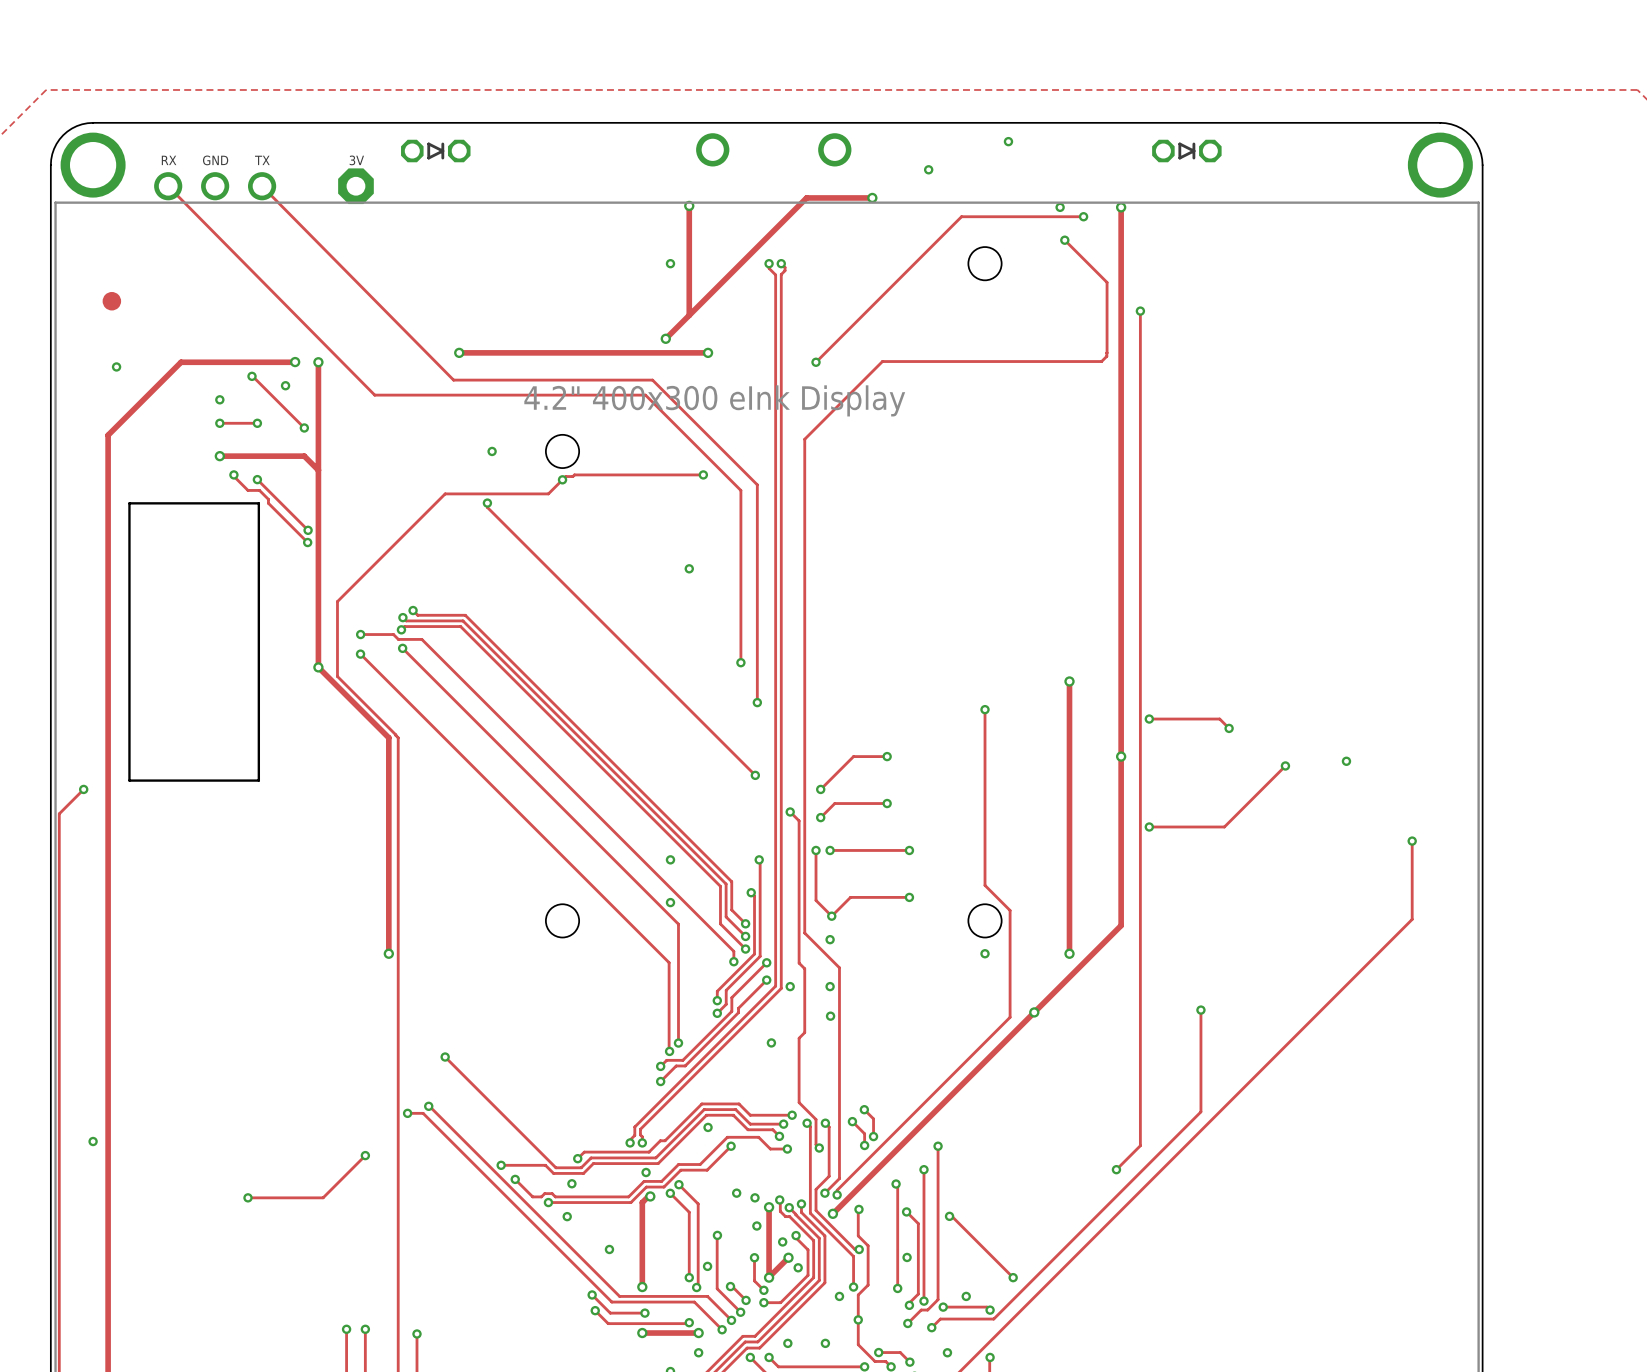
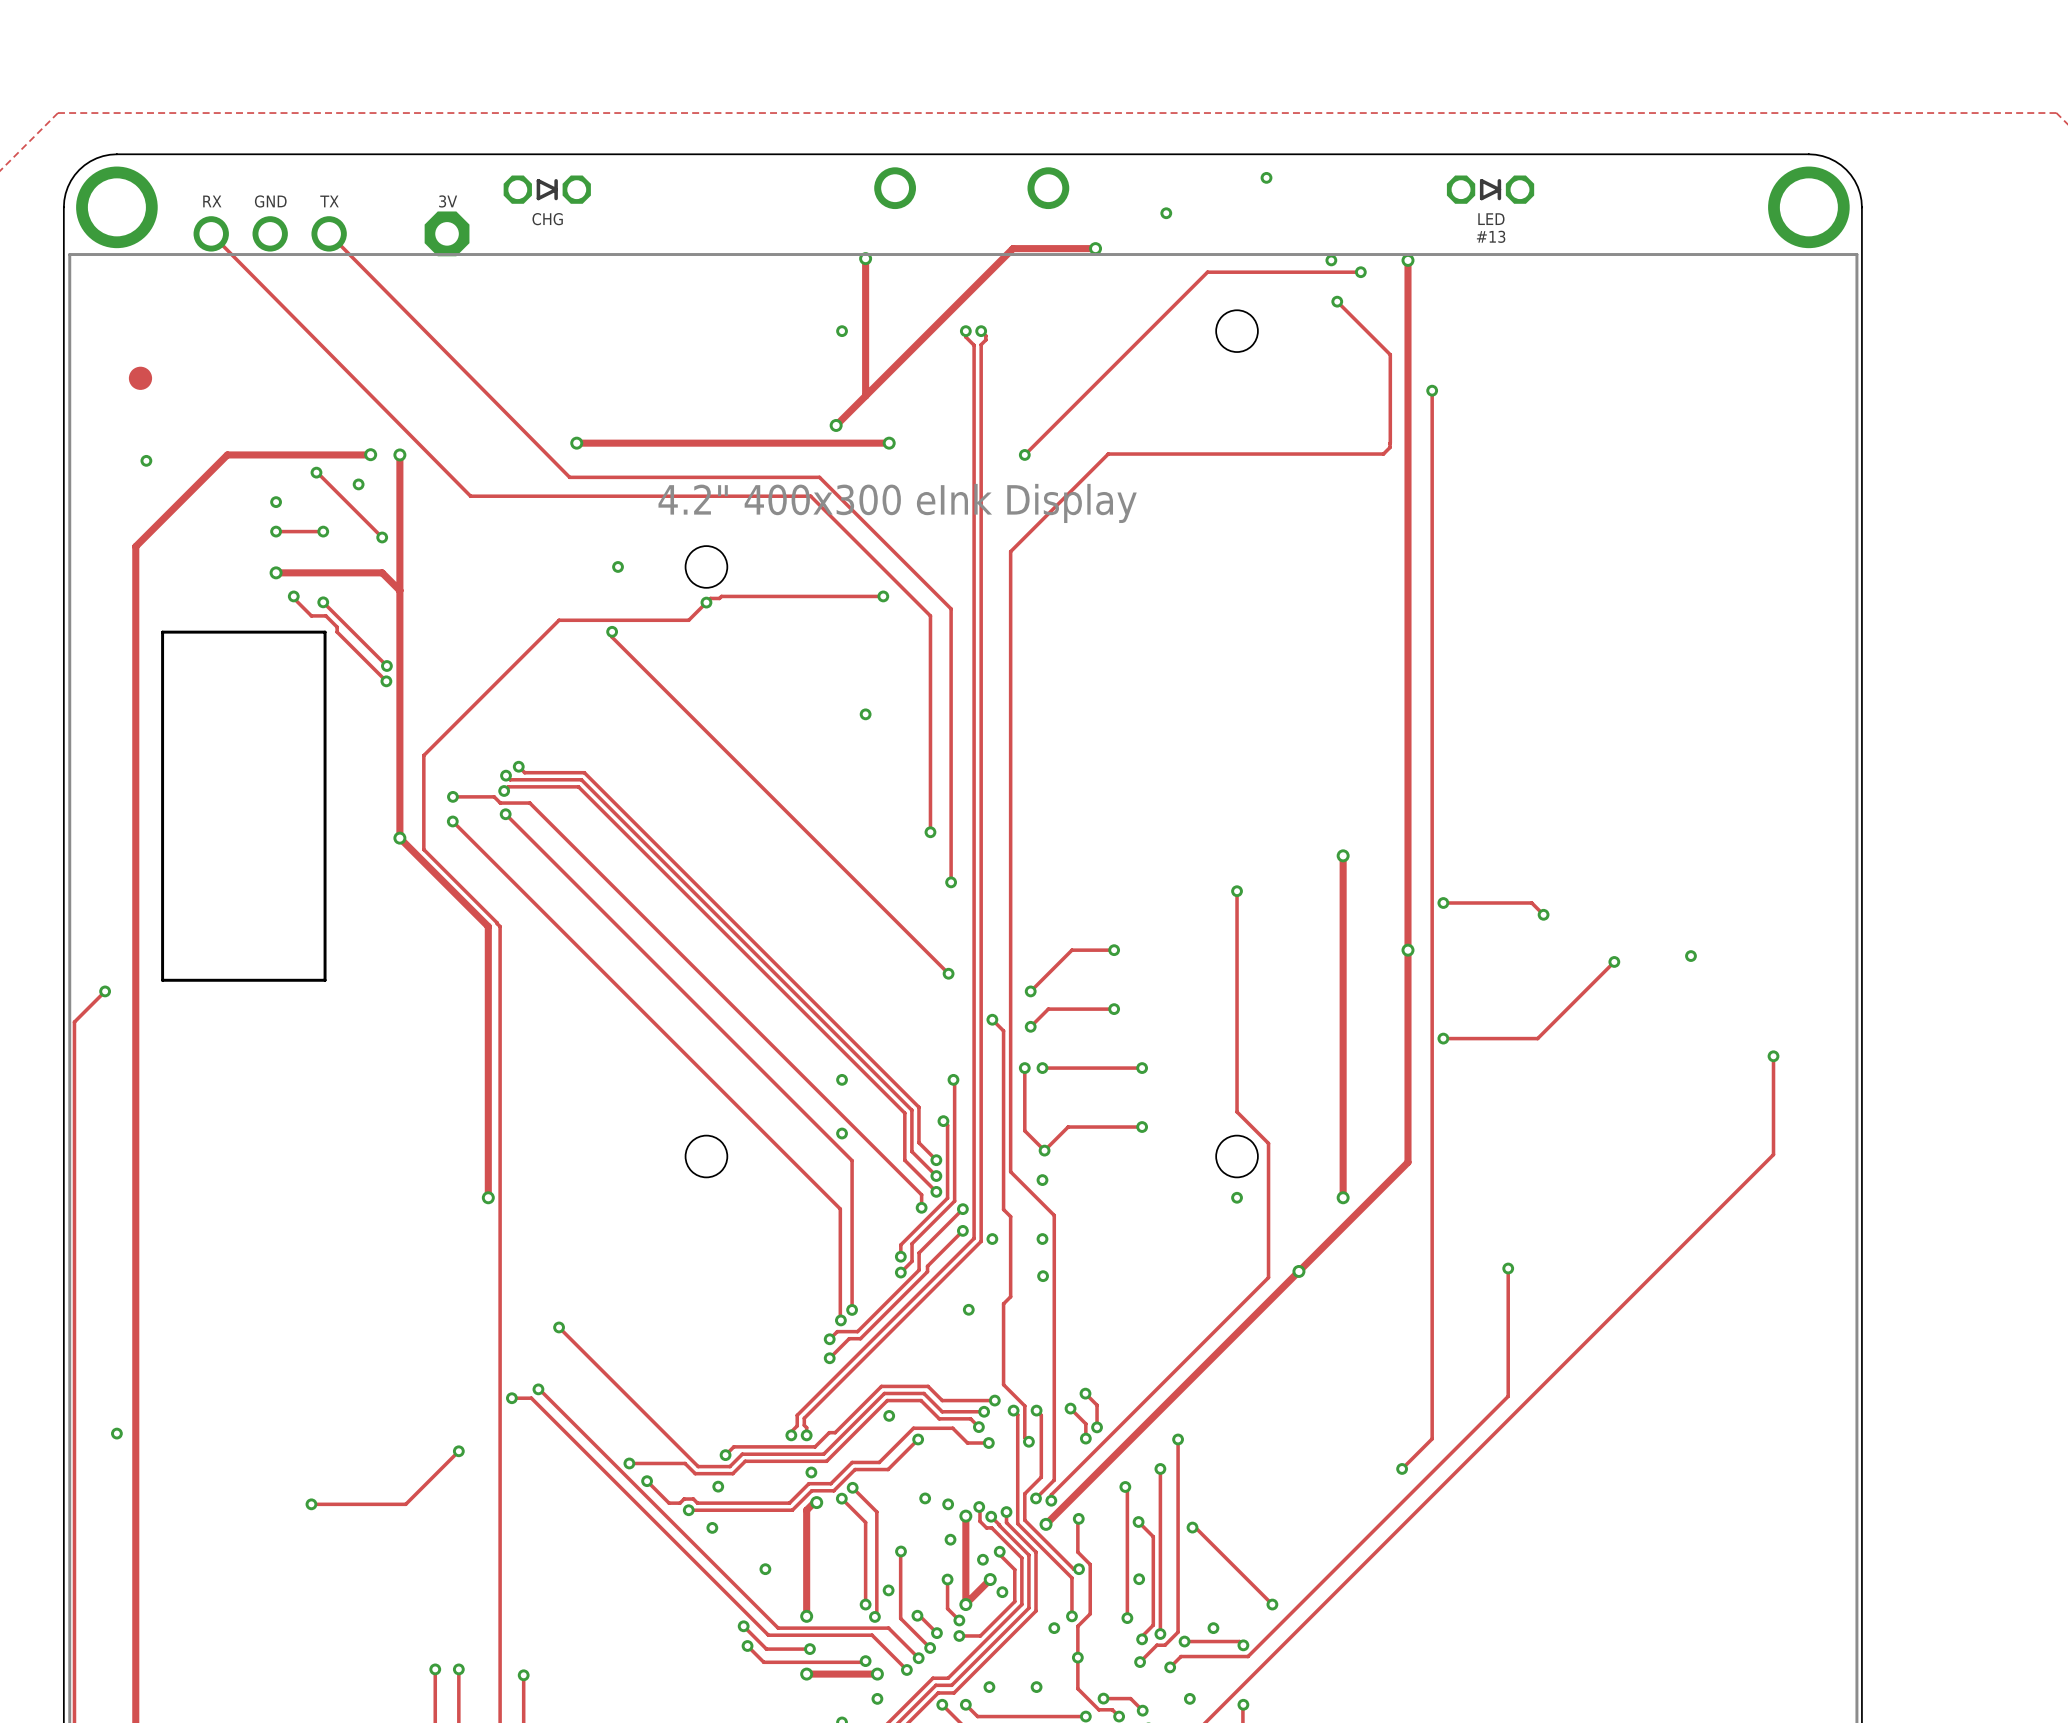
text: none -> CHG (547, 219)
text: none -> LED (1491, 219)
text: none -> #13 (1491, 236)

